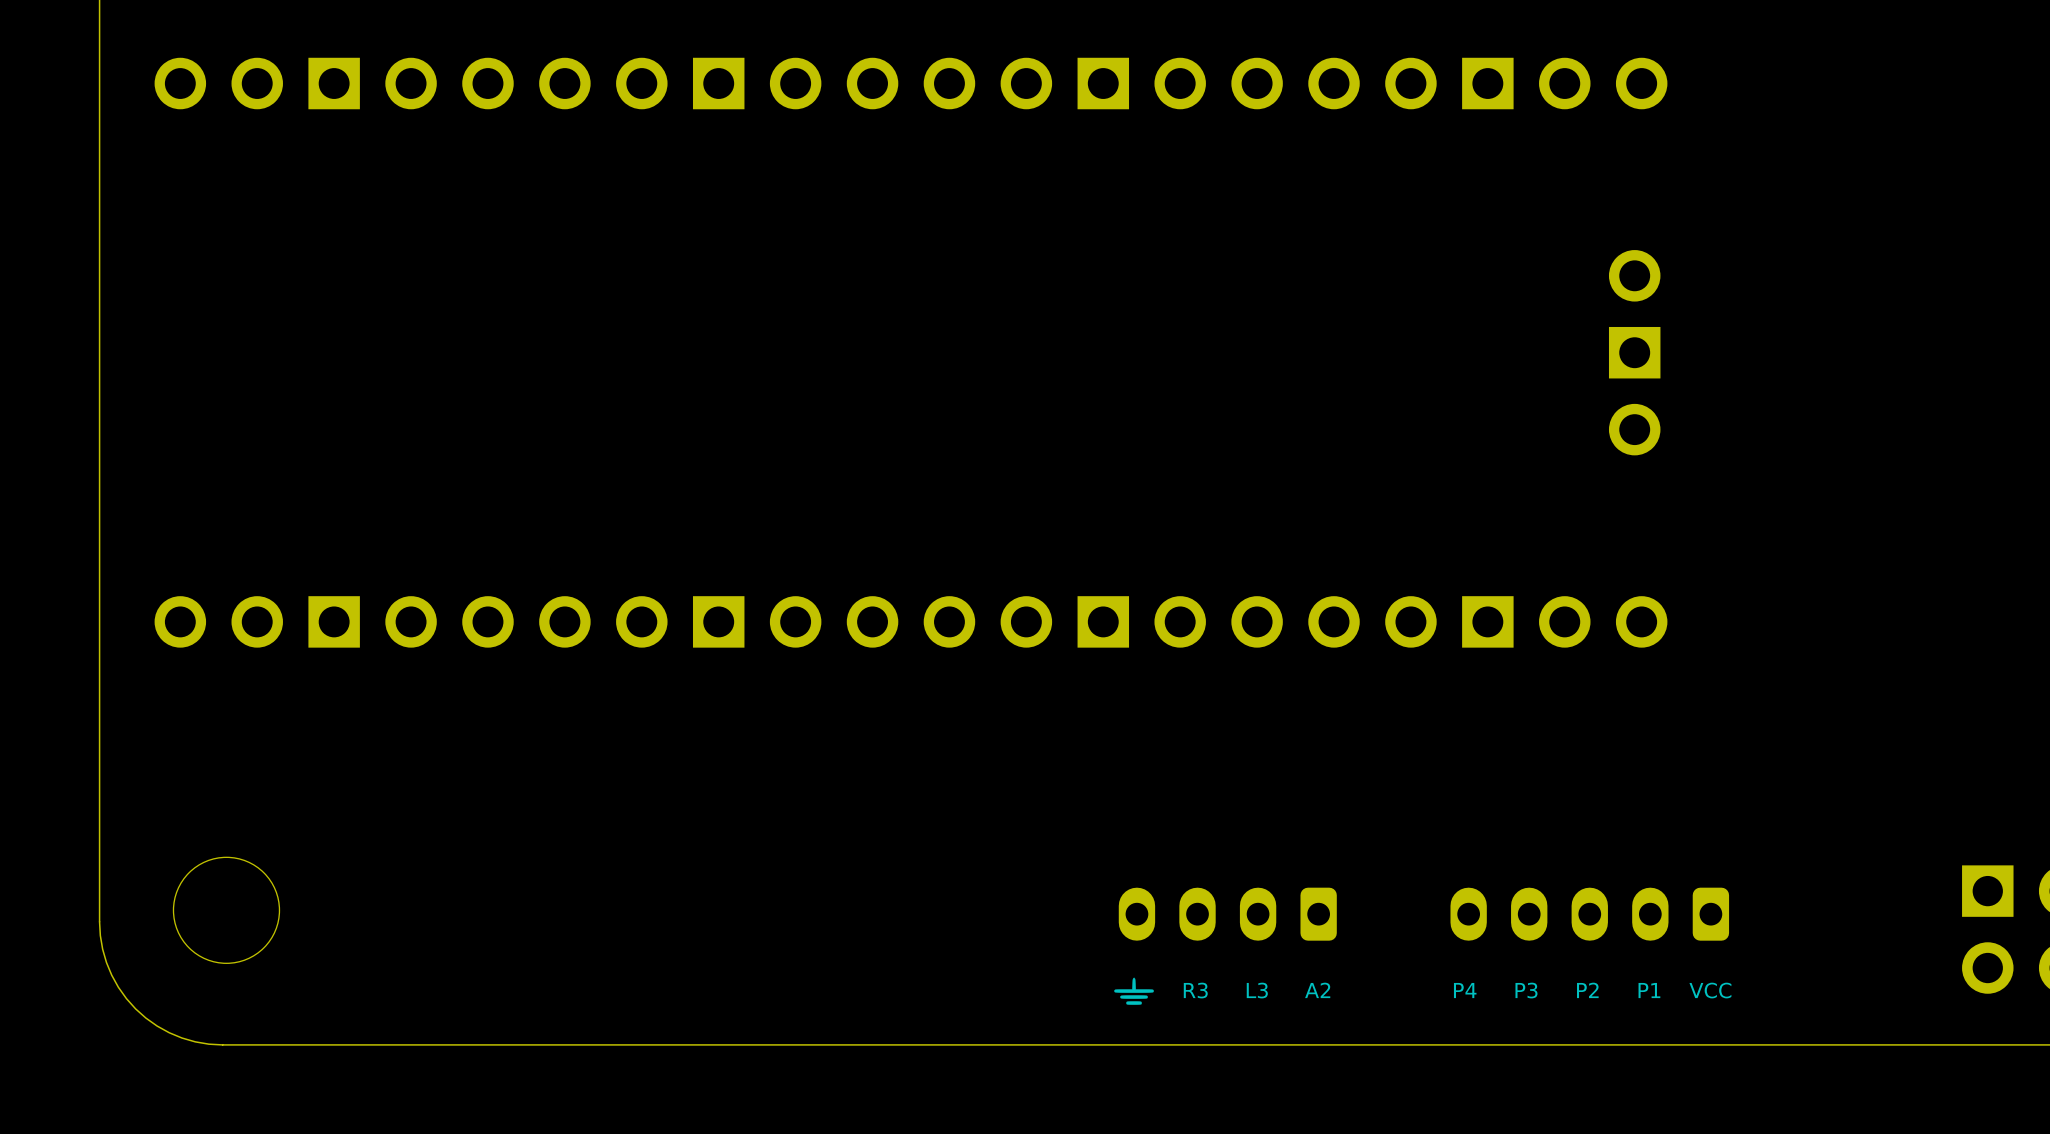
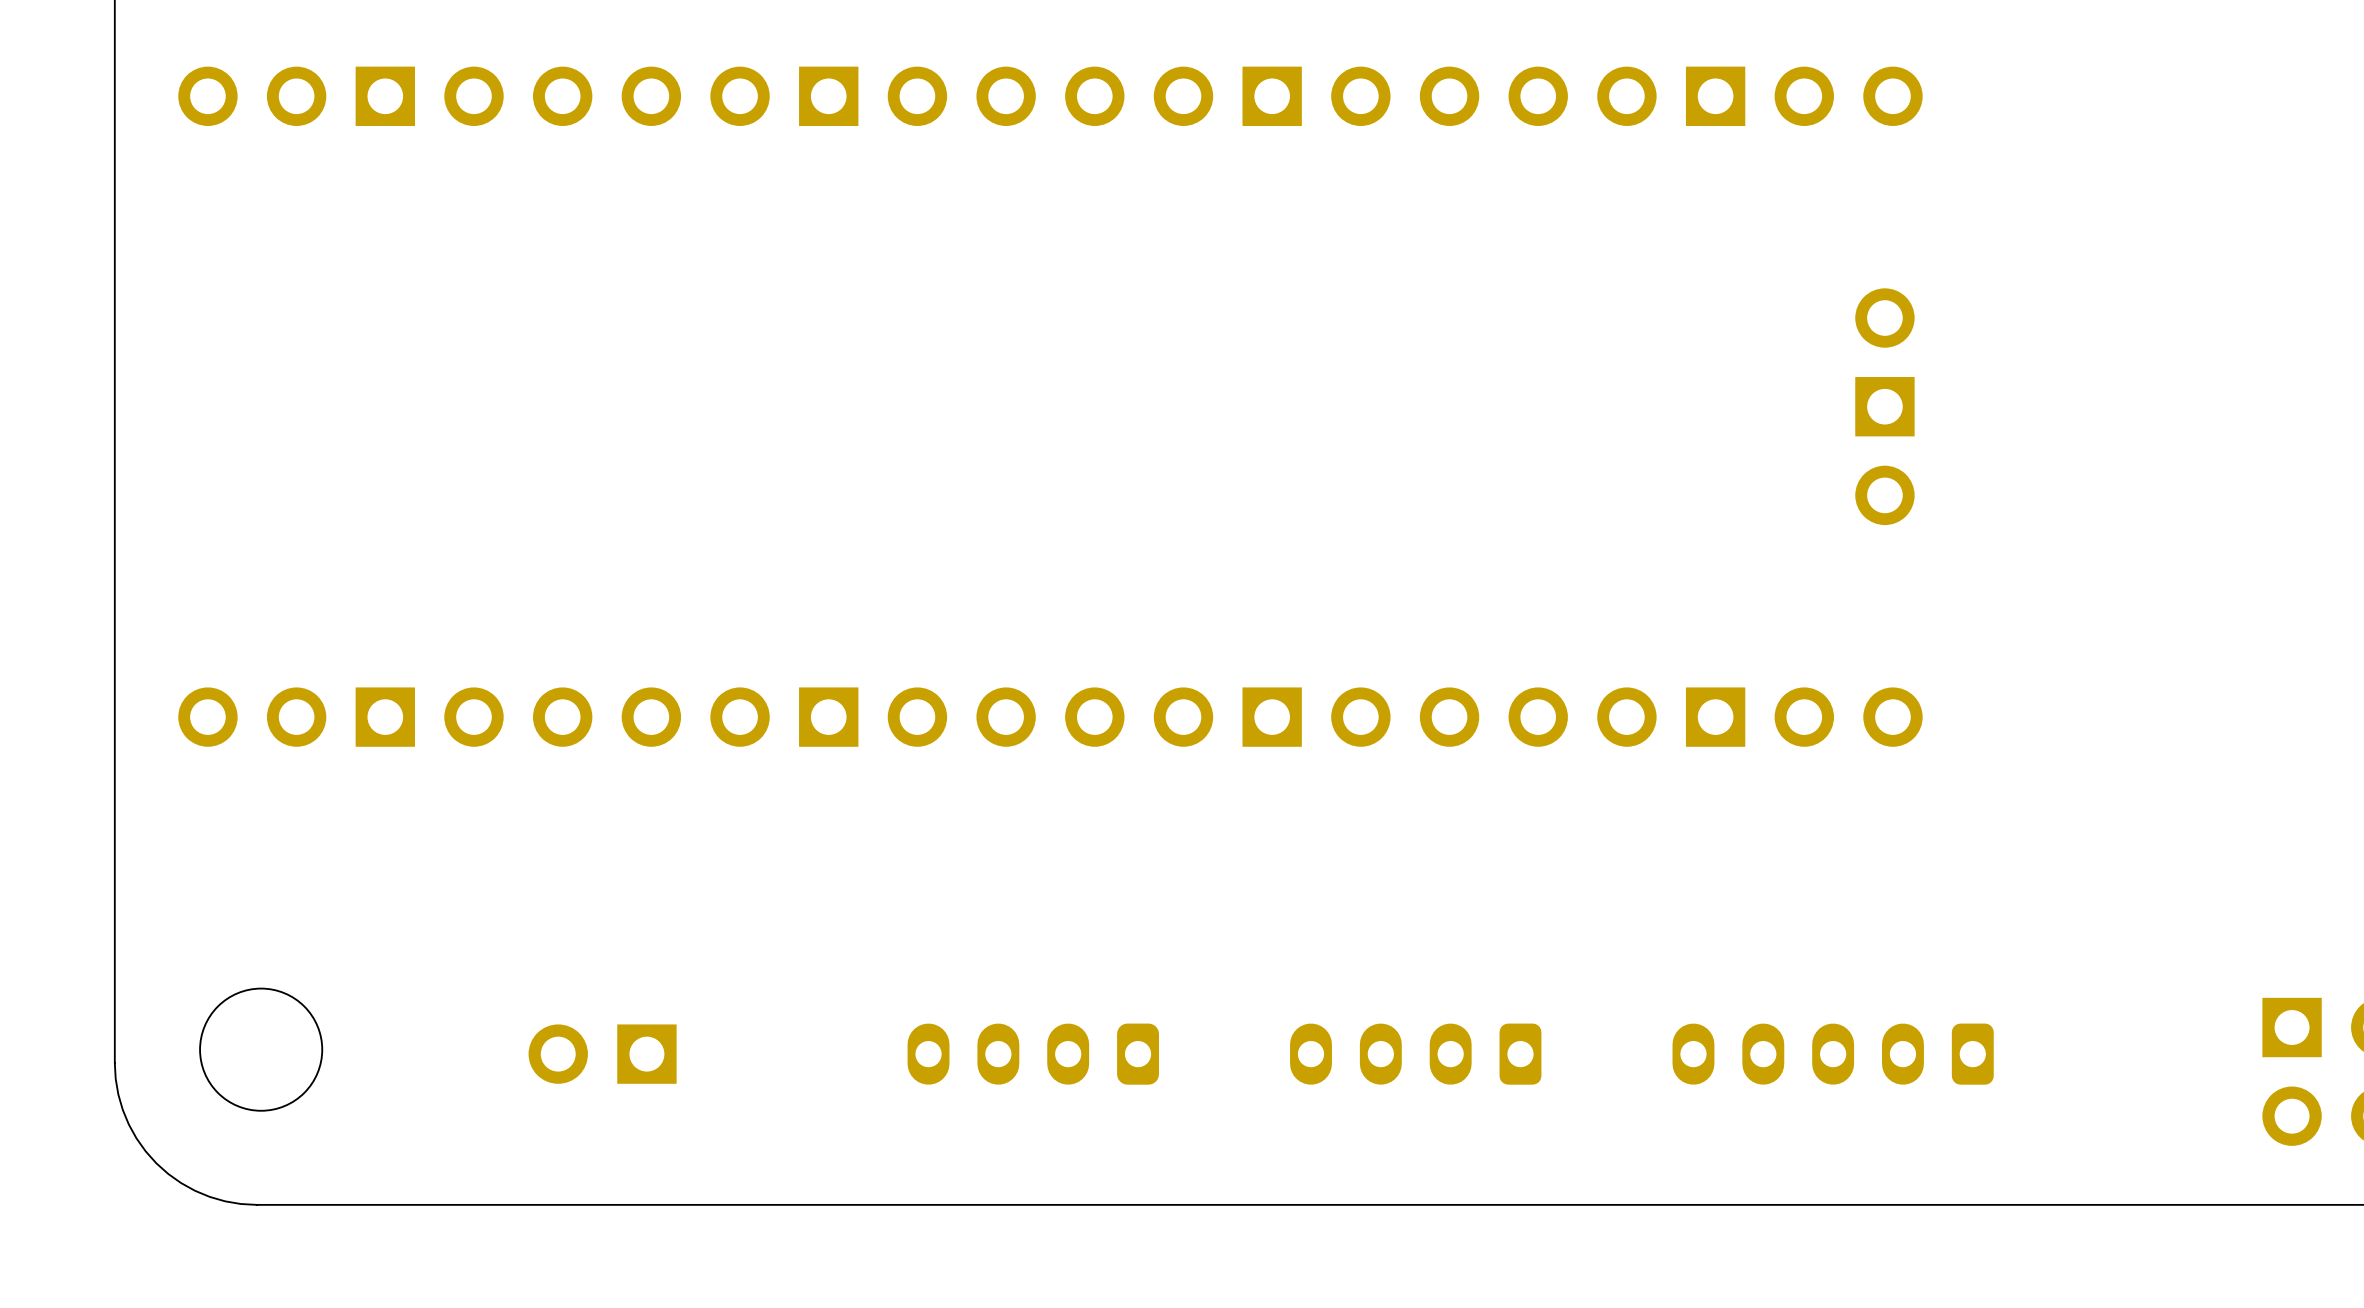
part: none -> (602, 1054)
part: none -> (1033, 1054)
drawing: [1114, 977, 1154, 1005] -> none
text: R3 (1195, 990) -> none
text: L3 (1257, 990) -> none
text: A2 (1317, 990) -> none
text: P4 (1465, 990) -> none
text: P3 (1526, 990) -> none
text: P2 (1587, 990) -> none
text: P1 (1649, 990) -> none
text: VCC (1710, 990) -> none

